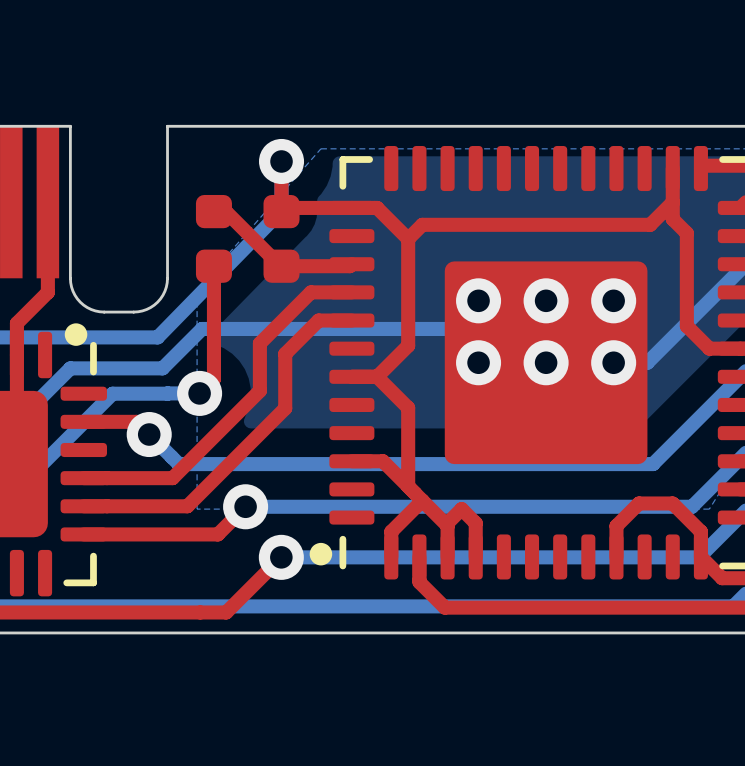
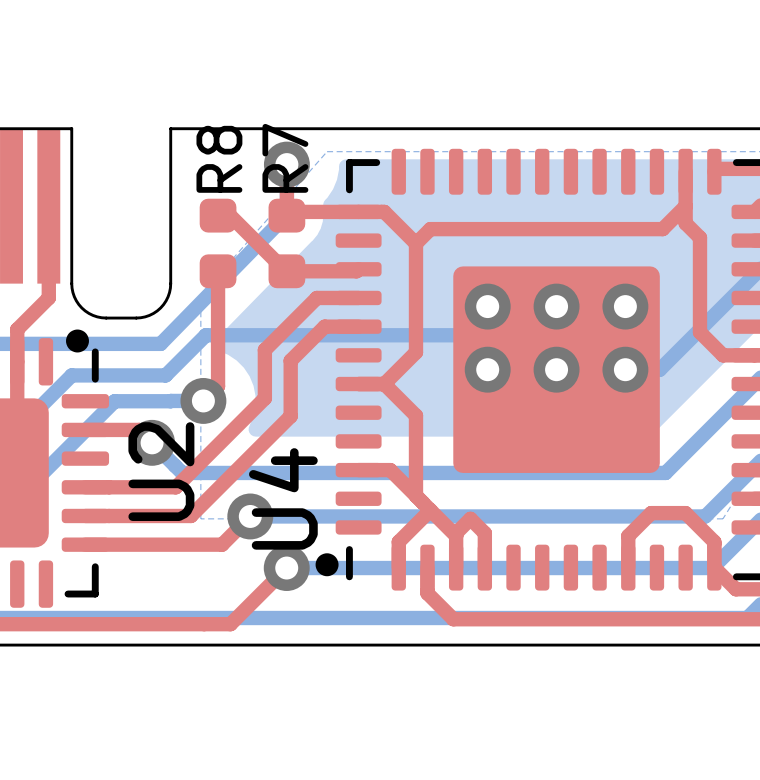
R8 name: none -> R8 (219, 159)
R7 name: none -> R7 (285, 158)
U2 name: none -> U2 (161, 471)
U4 name: none -> U4 (283, 498)

